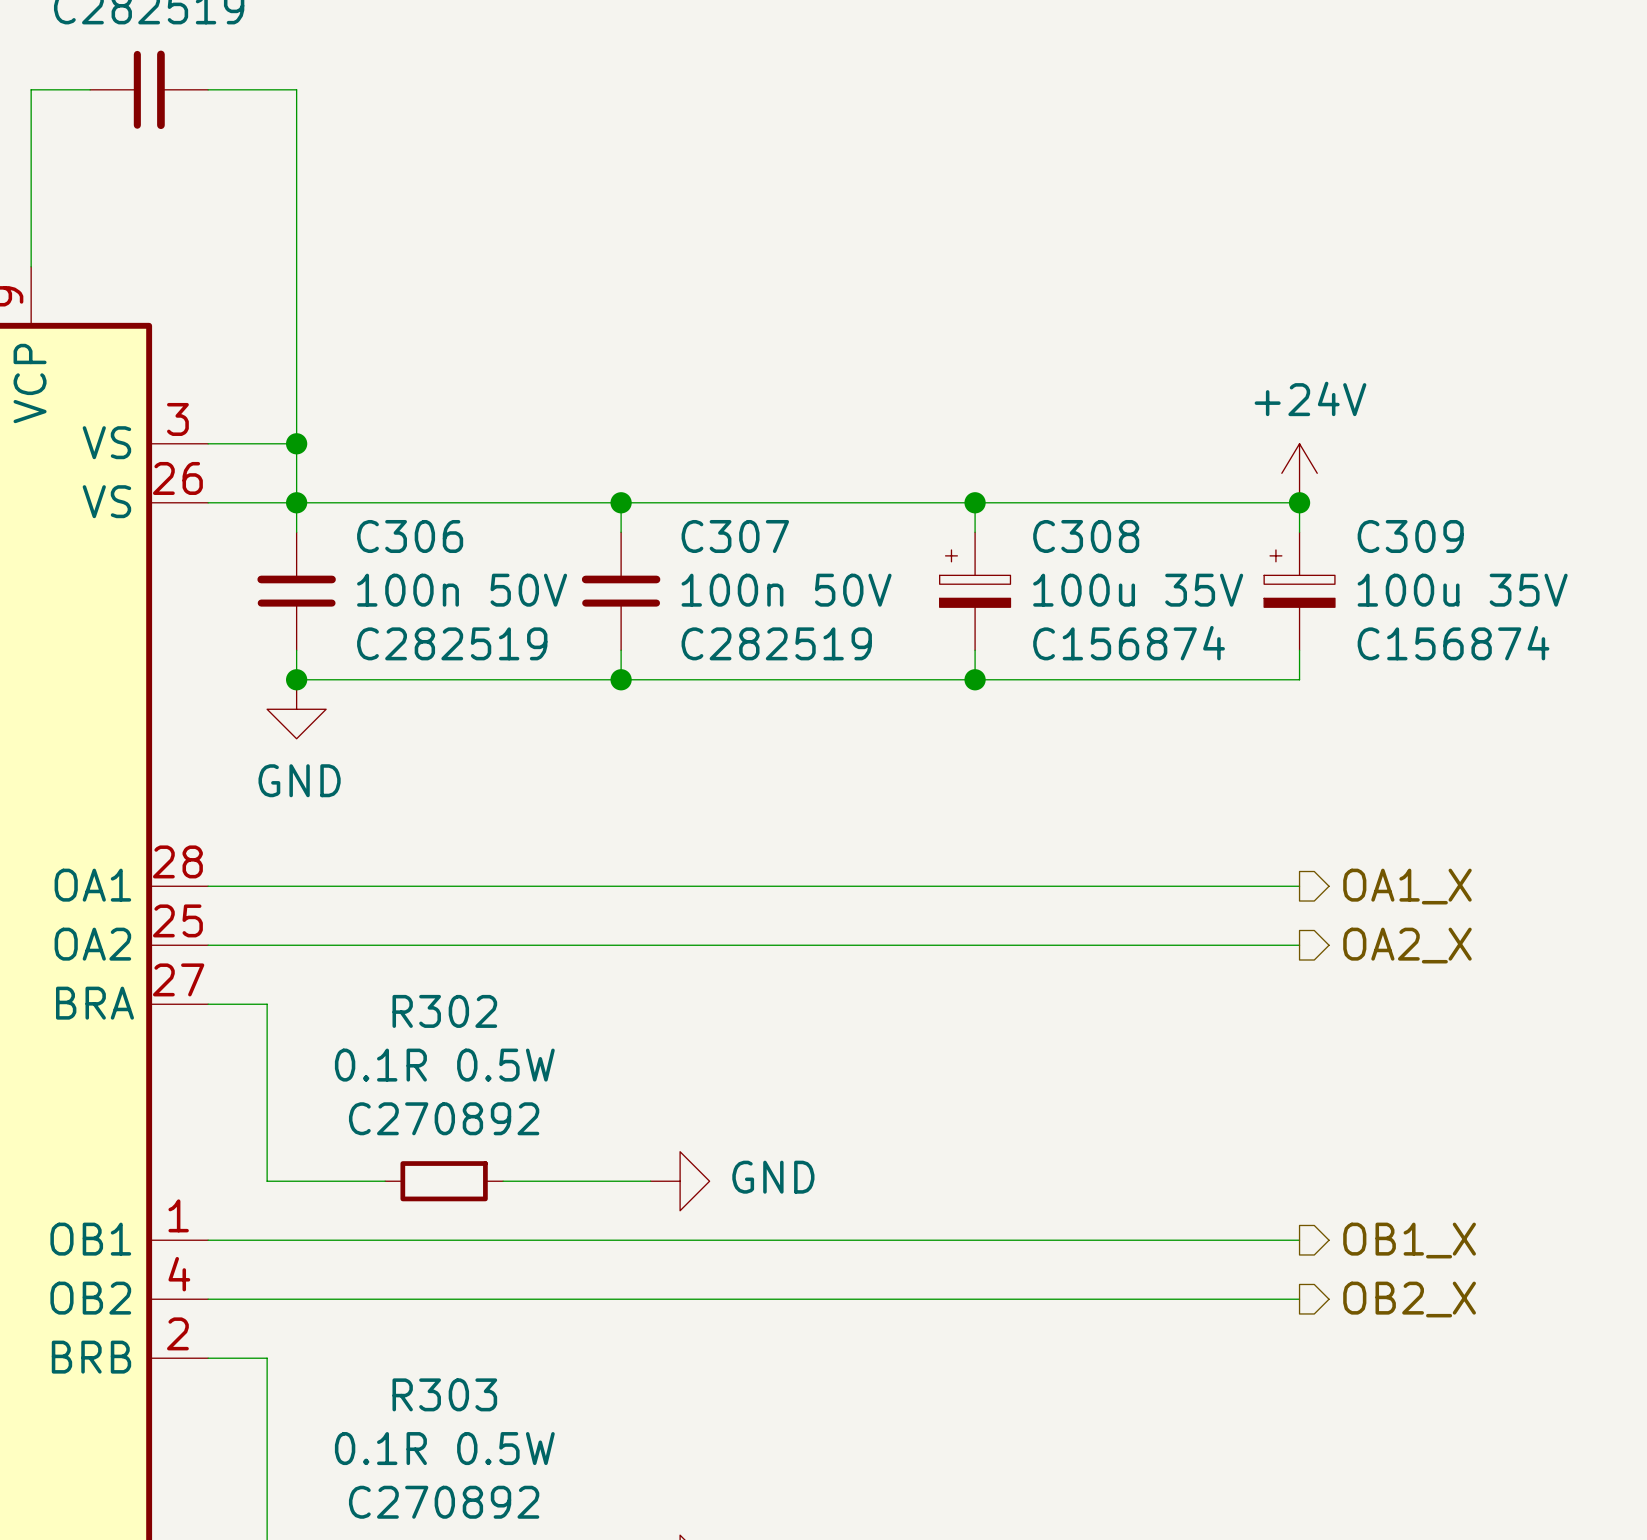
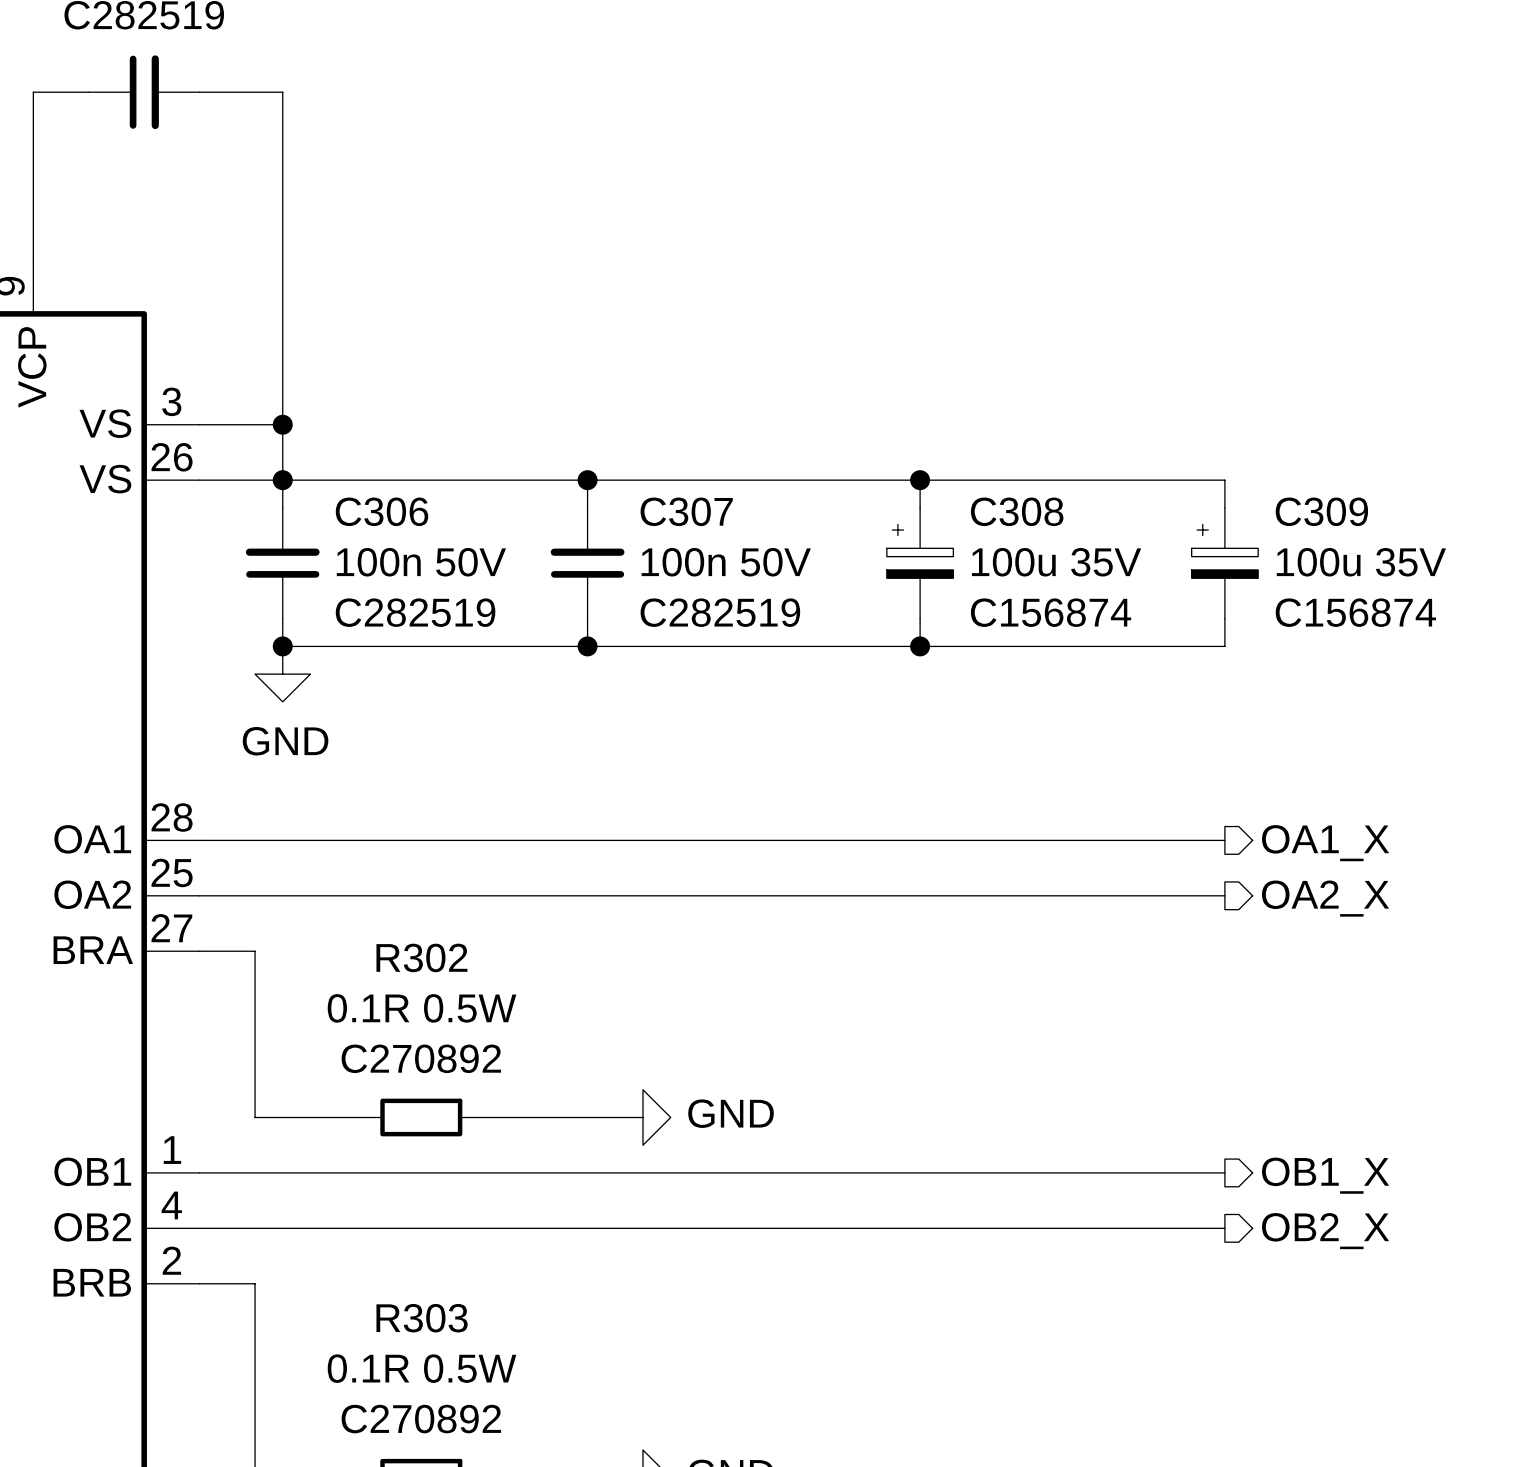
power symbol: +24V (1299, 473) -> none
junction: (1299, 502) -> none

